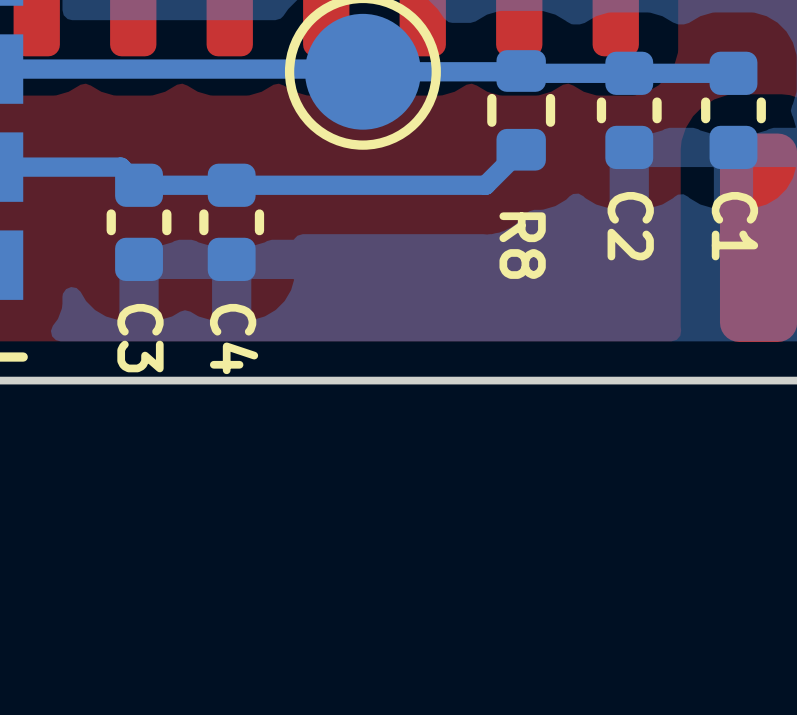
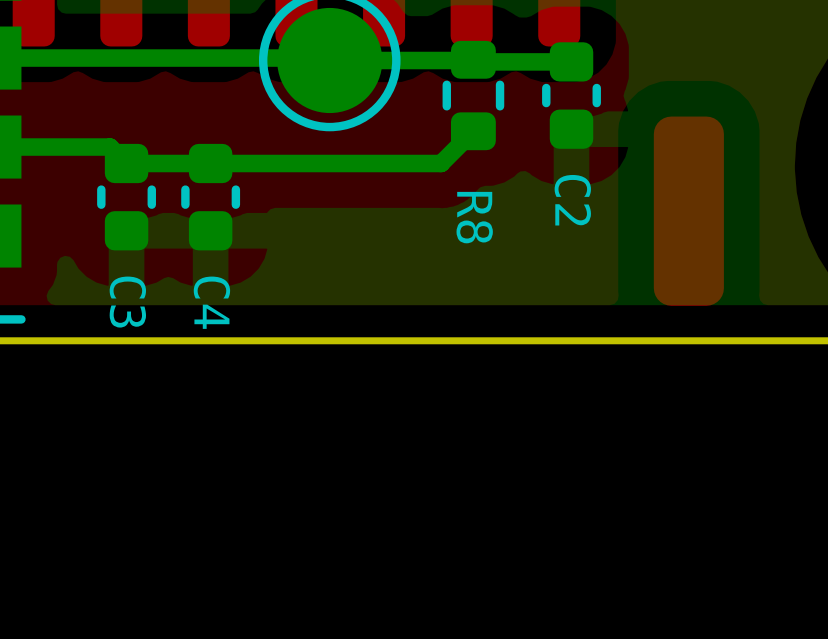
bottom track: (733, 73) (629, 73) -> none
C1: (733, 110) -> none

